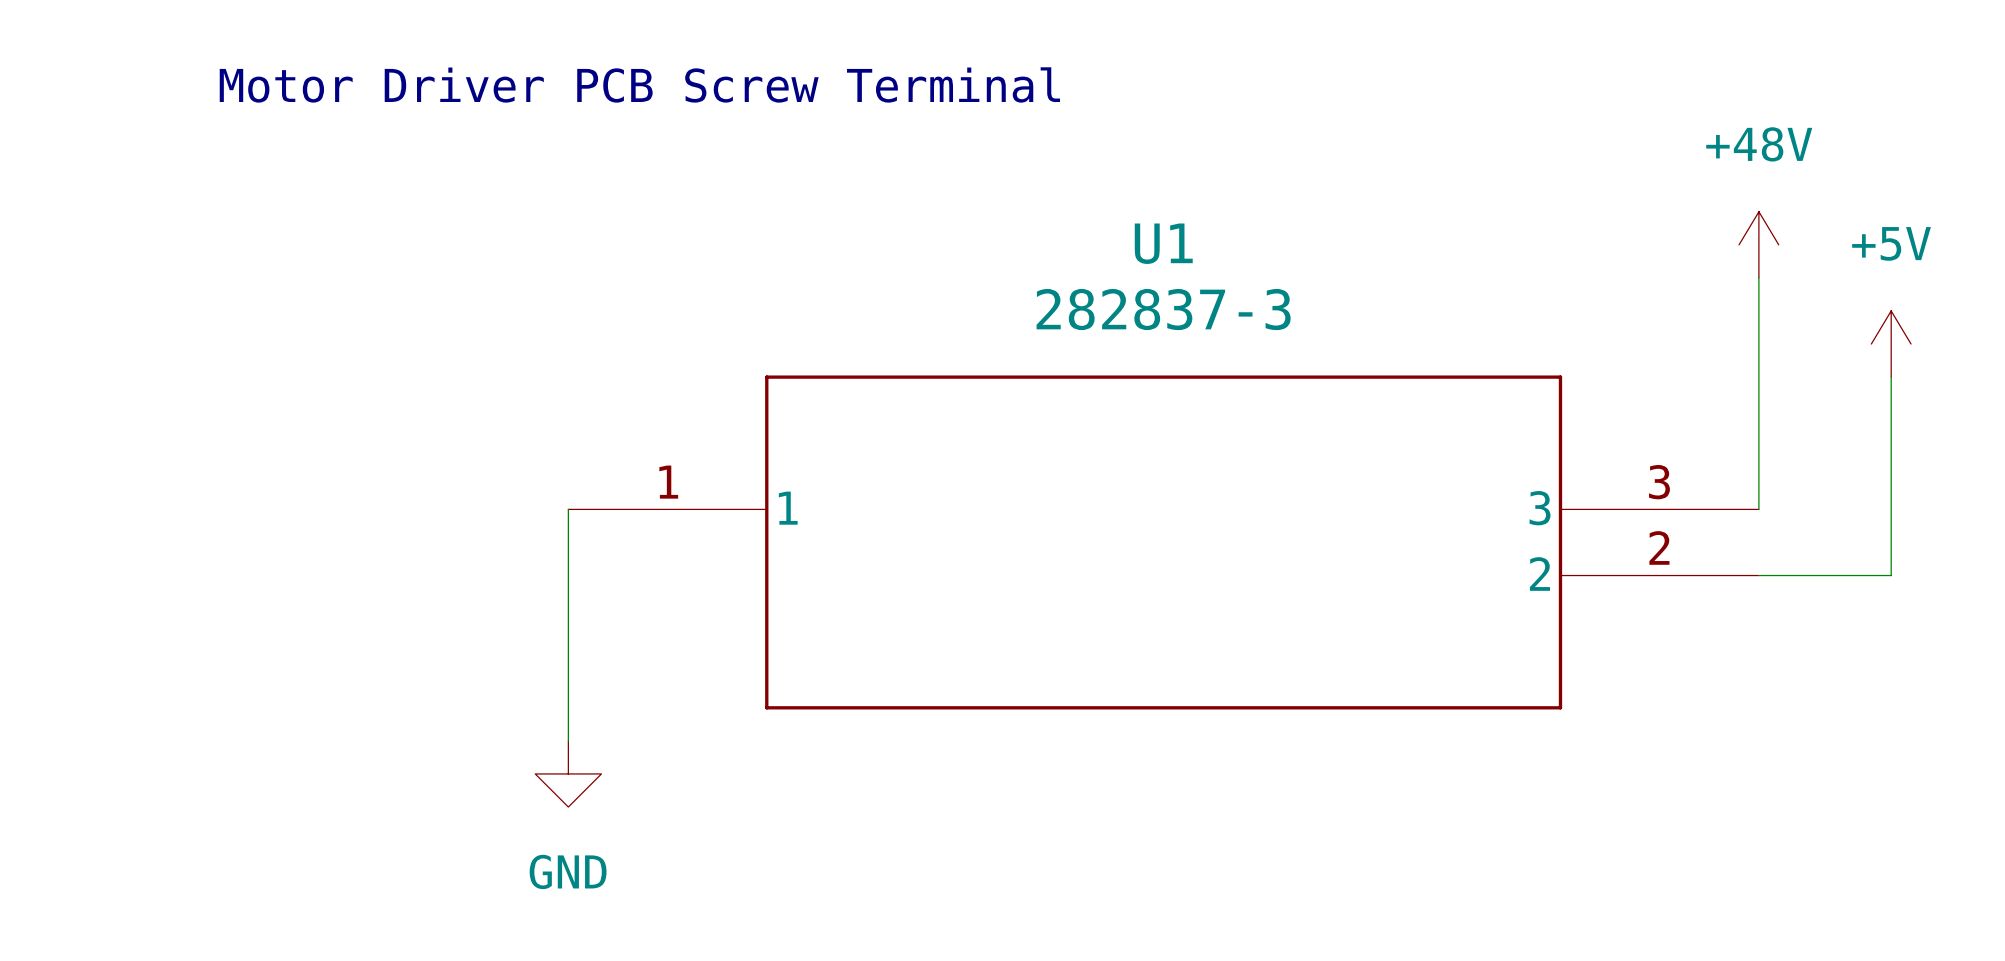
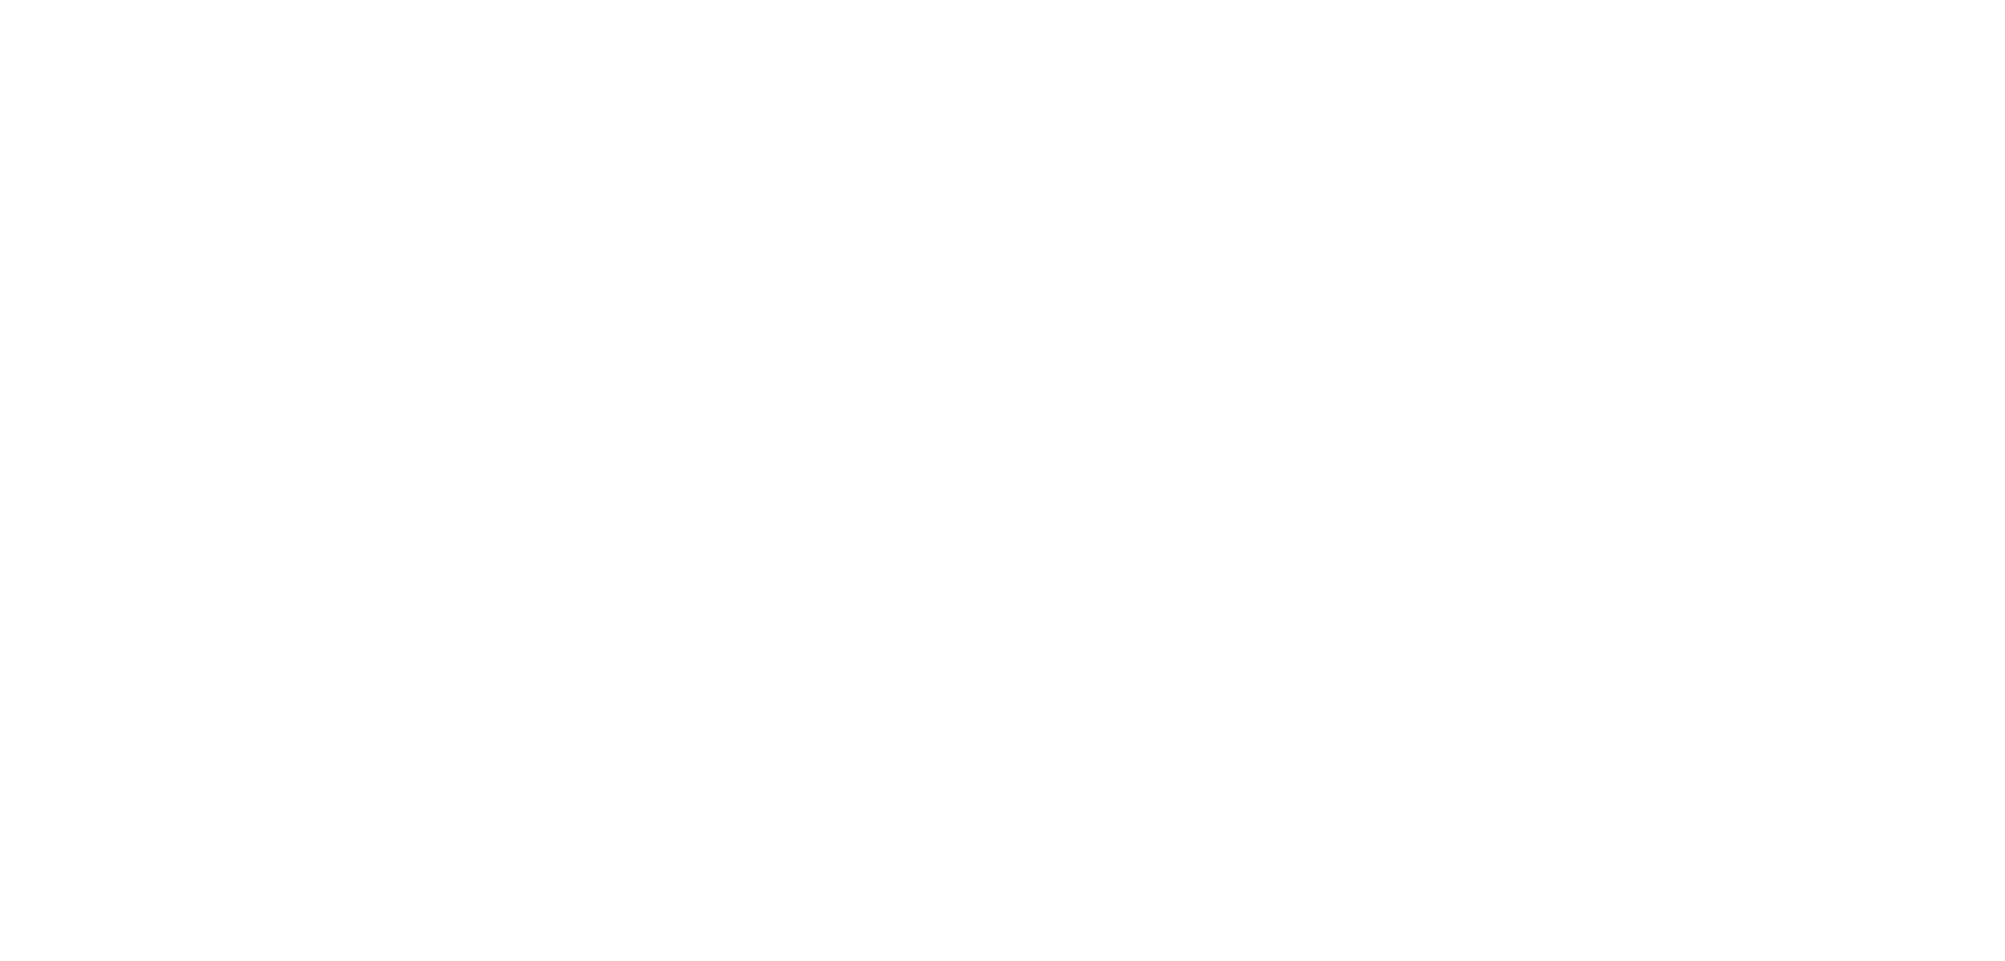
text: Motor Driver PCB Screw Terminal (639, 84) -> none
power symbol: +48V (1758, 244) -> none
wire: (1758, 277) (1758, 509) -> none
power symbol: +5V (1891, 344) -> none
wire: (1891, 377) (1891, 575) (1758, 575) -> none
wire: (568, 509) (568, 740) -> none
U1: 282837-3 (1163, 542) -> none
power symbol: GND (568, 773) -> none

